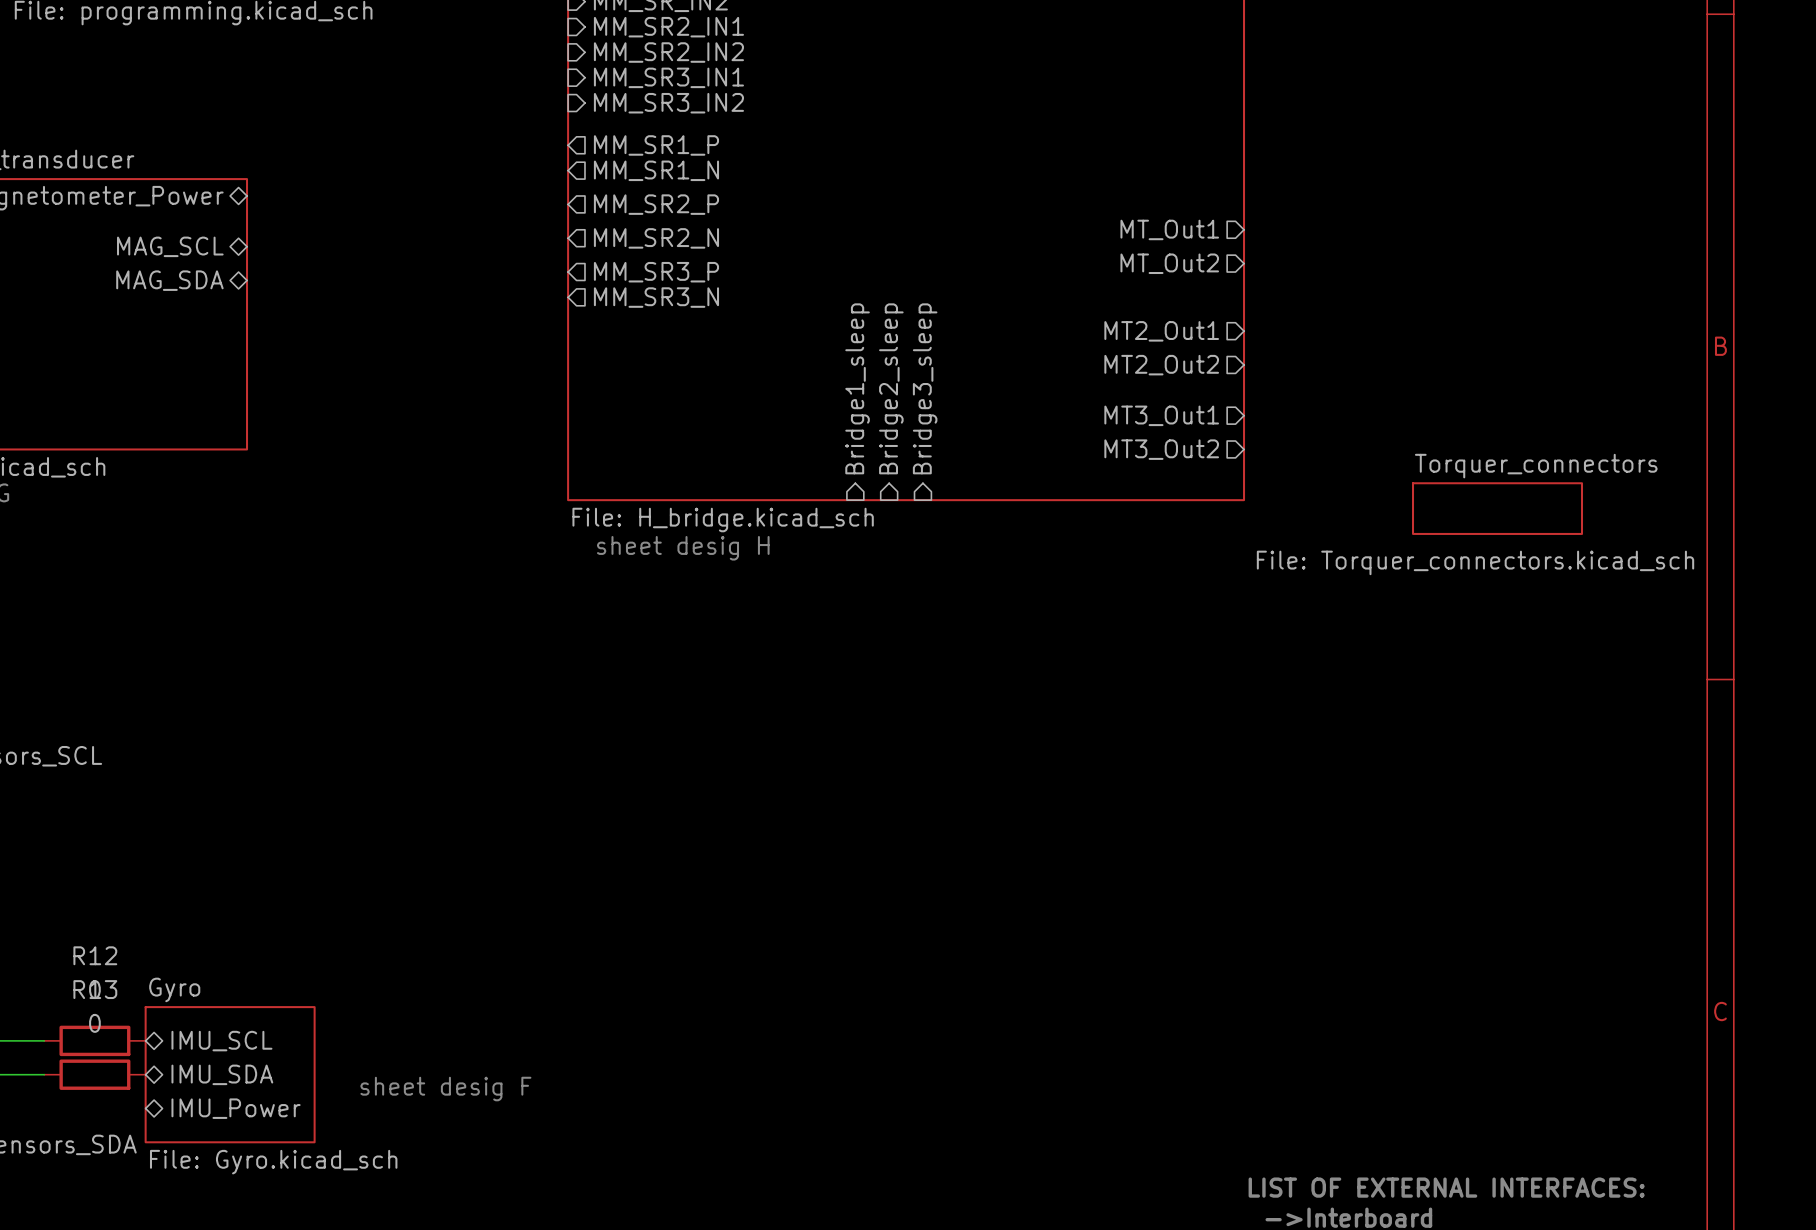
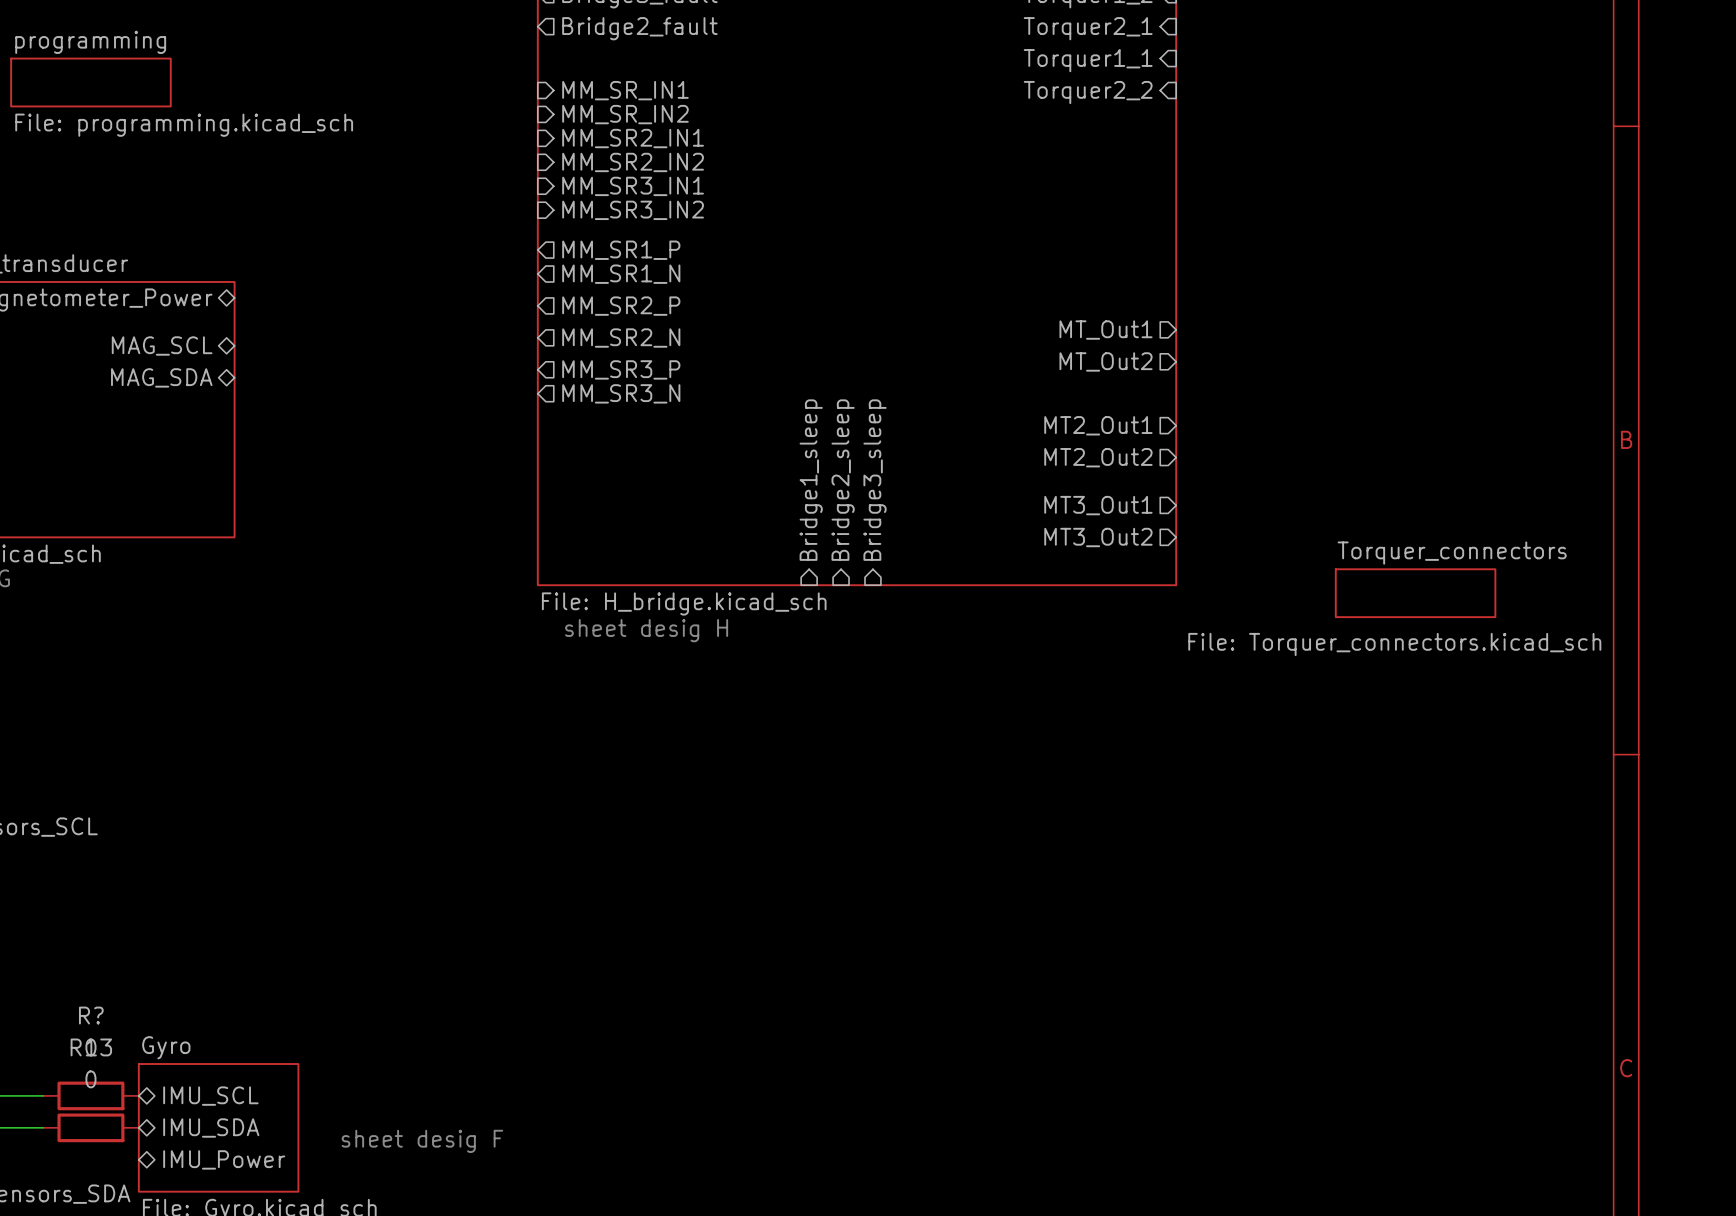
R12 name: R12 (95, 955) -> R? (91, 1015)

